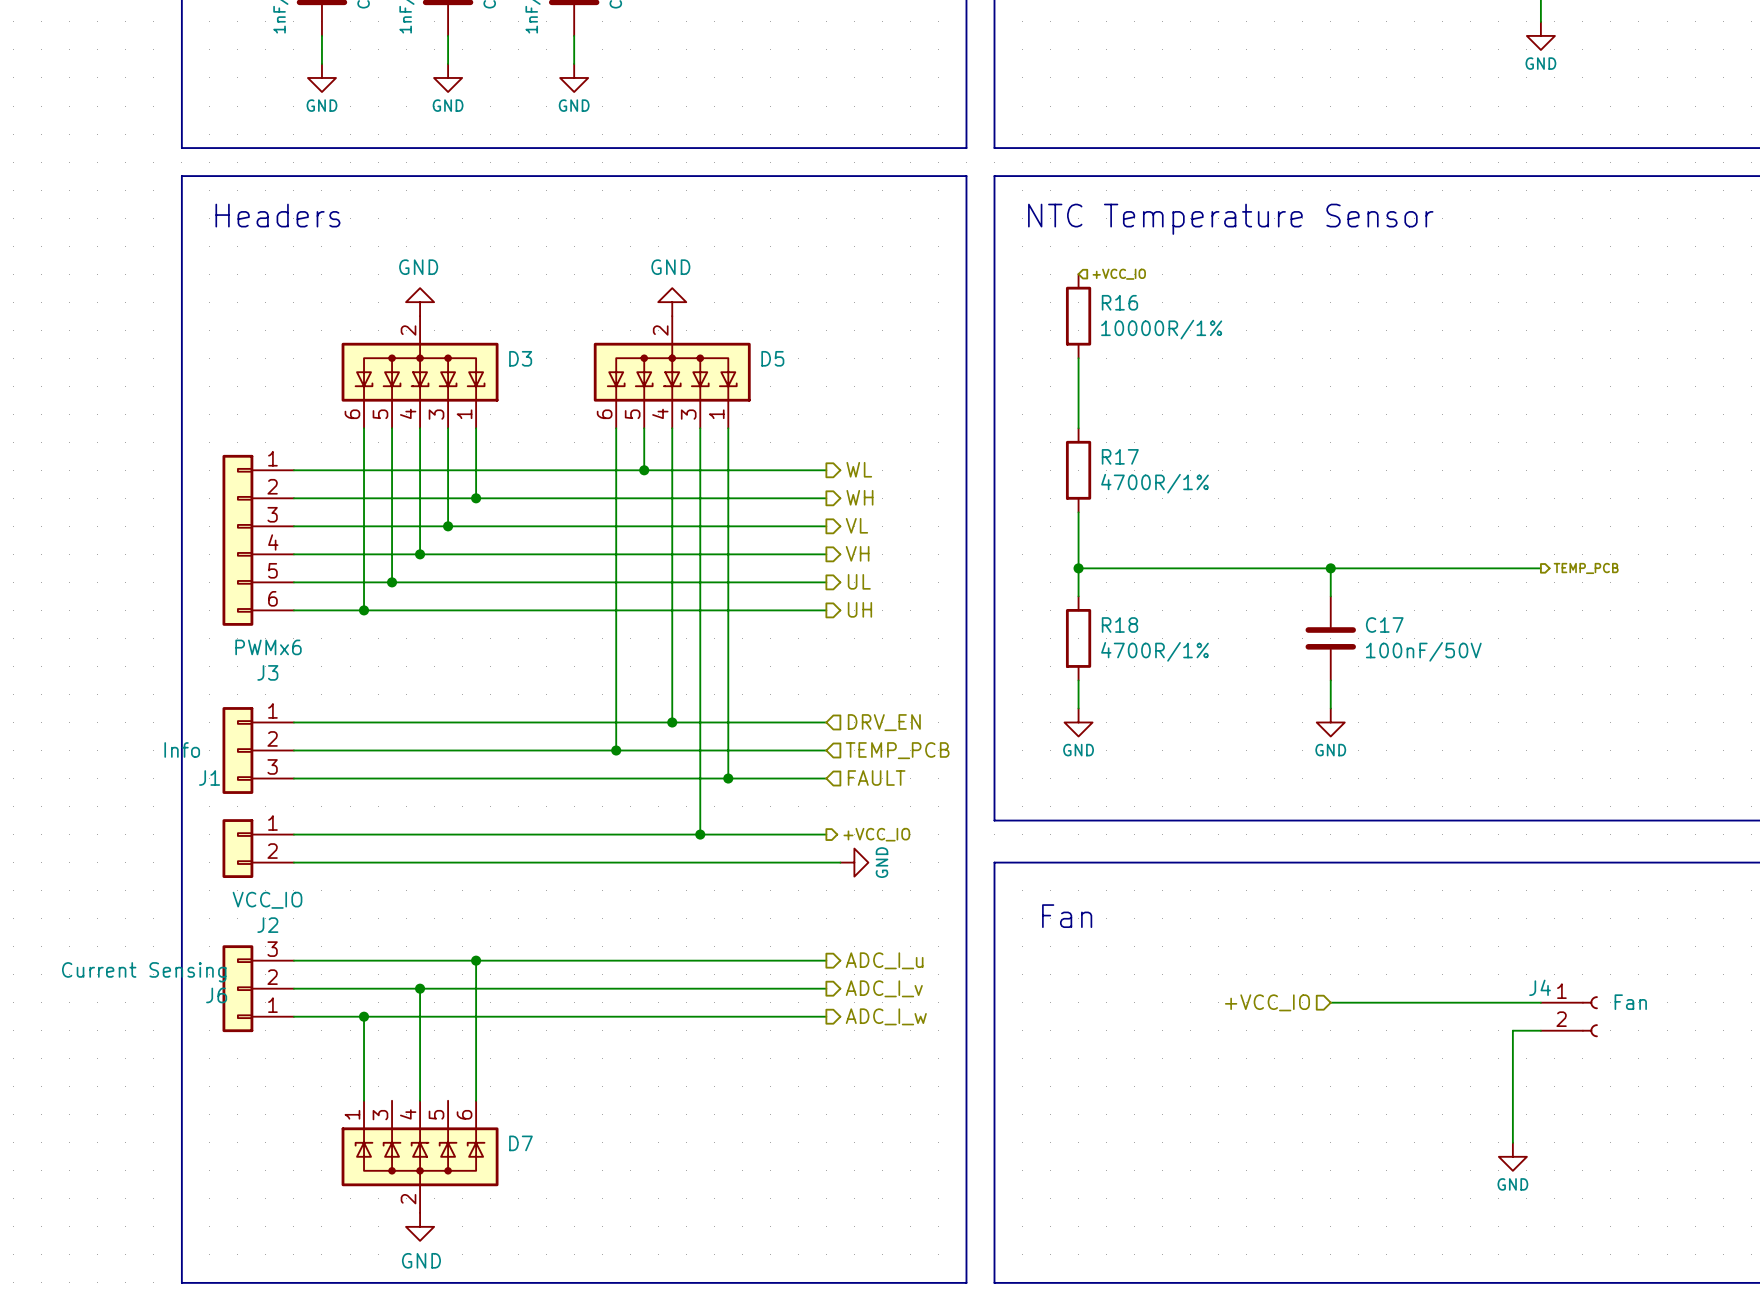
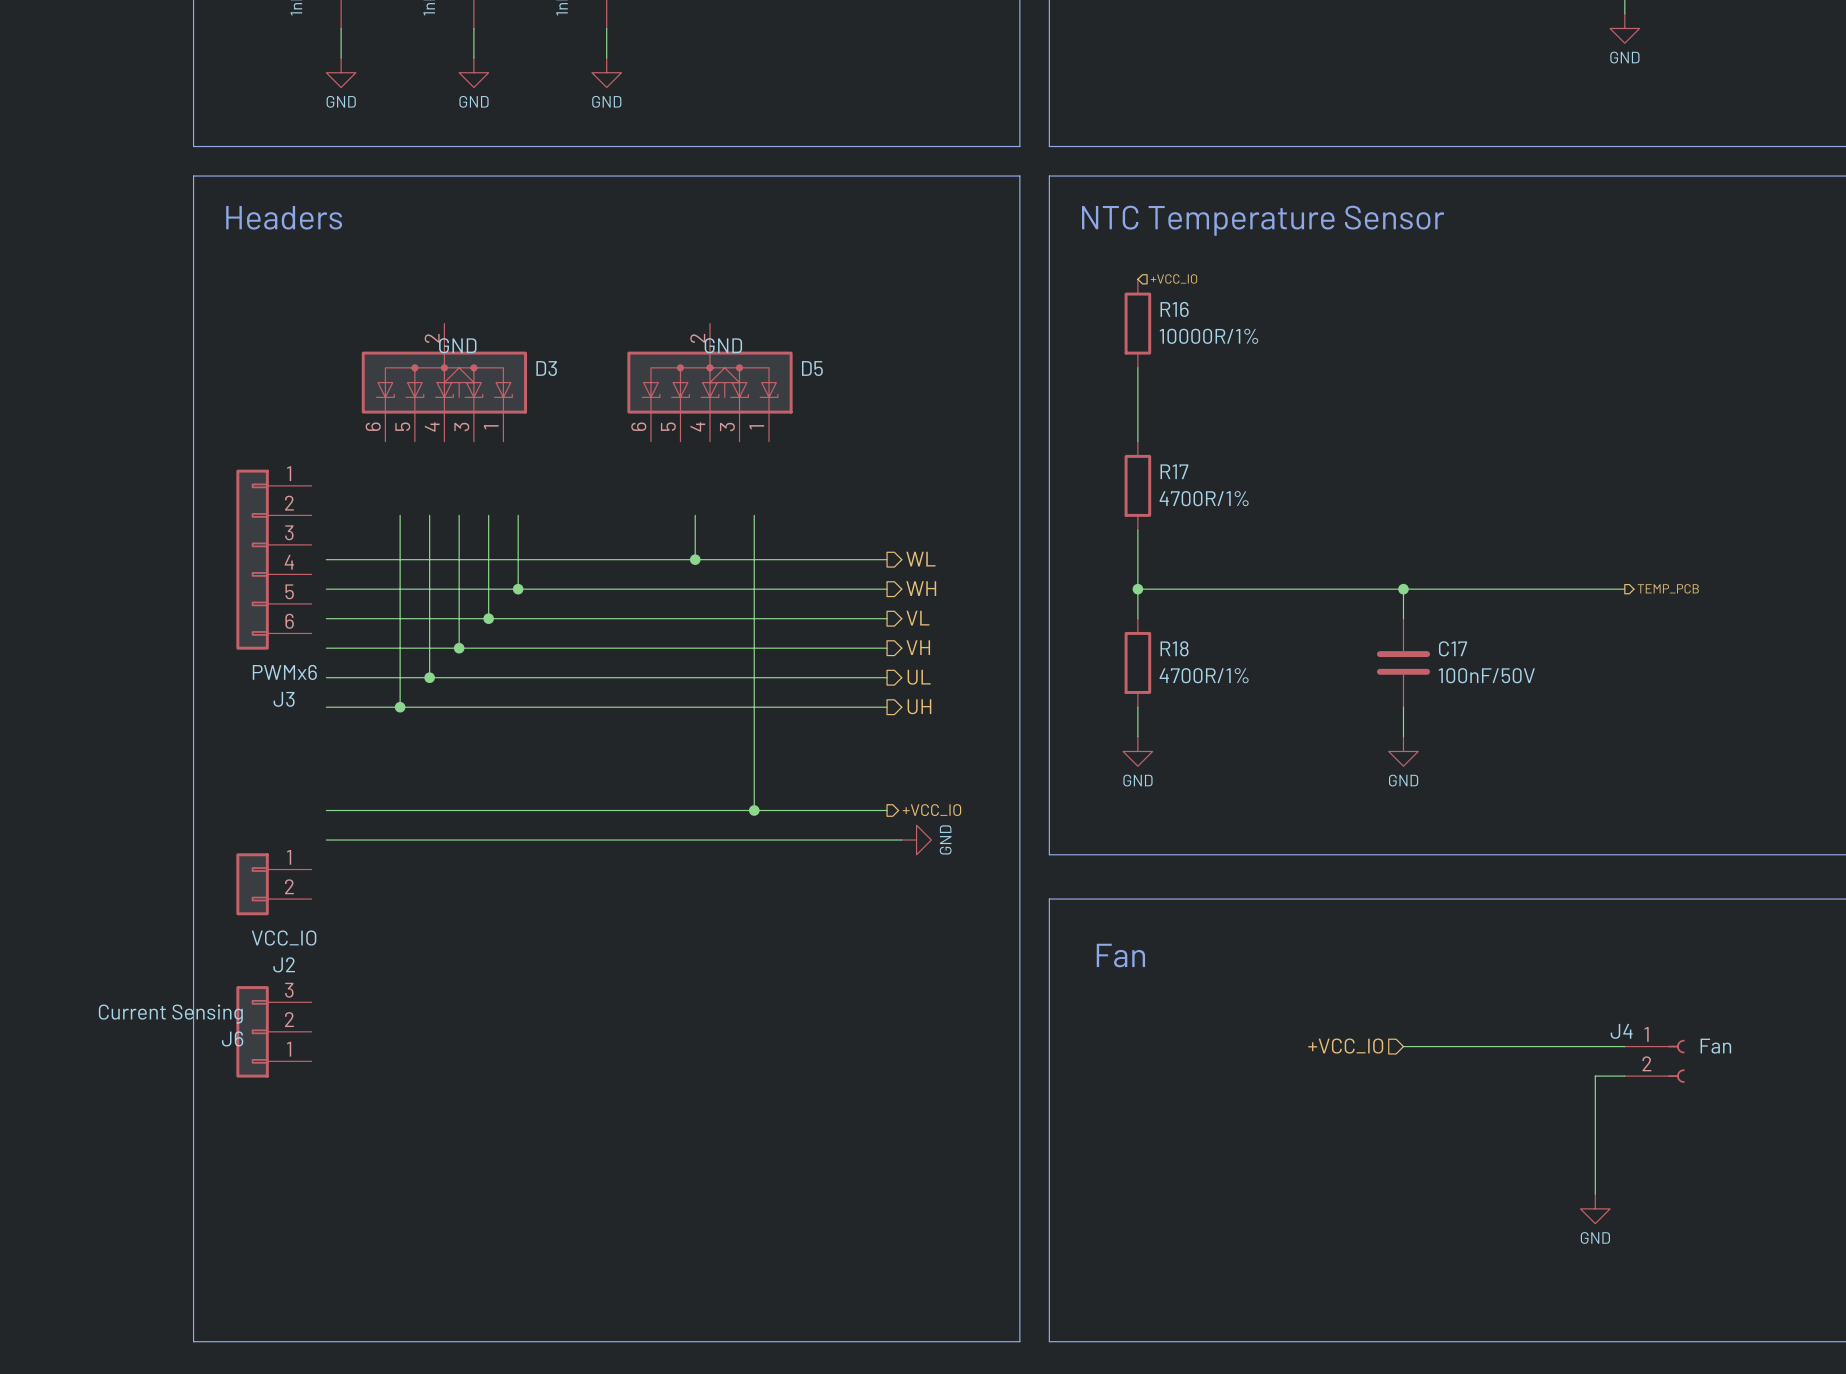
power symbol position: GND (420, 302) -> GND (459, 382)
power symbol position: GND (672, 302) -> GND (724, 382)
wire: (364, 428) (364, 610) -> (400, 515) (400, 707)
wire: (392, 428) (392, 582) -> (429, 515) (429, 677)
wire: (420, 428) (420, 554) -> (459, 515) (459, 648)
wire: (448, 428) (448, 526) -> (488, 515) (488, 618)
wire: (476, 428) (476, 498) -> (518, 515) (518, 589)
wire: (616, 428) (616, 750) -> none
wire: (644, 428) (644, 470) -> (695, 515) (695, 559)
wire: (672, 428) (672, 722) -> none
wire: (700, 428) (700, 834) -> none
wire: (728, 428) (728, 778) -> none
hierarchical label position: WL (859, 469) -> WL (920, 559)
wire: (293, 470) (826, 470) -> (326, 559) (887, 559)
junction: (644, 470) -> none
hierarchical label position: WH (859, 497) -> WH (921, 588)
wire: (293, 498) (826, 498) -> (326, 589) (887, 589)
junction: (476, 498) -> none
wire: none -> (754, 515) (754, 810)
hierarchical label position: VL (856, 525) -> VL (917, 618)
wire: (293, 526) (826, 526) -> (326, 618) (887, 618)
junction: (448, 526) -> none
junction: none -> (695, 559)
hierarchical label position: VH (857, 553) -> VH (918, 647)
wire: (293, 554) (826, 554) -> (326, 648) (887, 648)
junction: (420, 554) -> none
junction: none -> (518, 589)
hierarchical label position: UL (859, 581) -> UL (919, 677)
wire: (293, 582) (826, 582) -> (326, 677) (887, 677)
junction: (392, 582) -> none
junction: none -> (488, 618)
hierarchical label position: UH (859, 609) -> UH (919, 706)
wire: (293, 610) (826, 610) -> (326, 707) (887, 707)
junction: (364, 610) -> none
junction: none -> (459, 648)
junction: none -> (429, 677)
junction: none -> (400, 707)
wire: (293, 722) (826, 722) -> none
junction: (672, 722) -> none
hierarchical label: DRV_EN (884, 722) -> none
J1: Info (258, 750) -> none
wire: (293, 750) (826, 750) -> none
junction: (616, 750) -> none
hierarchical label: TEMP_PCB (897, 750) -> none
wire: (293, 778) (307, 778) -> none
junction position: (728, 778) -> (754, 810)
wire: none -> (872, 810) (887, 810)
hierarchical label: FAULT (876, 778) -> none
wire: (293, 834) (826, 834) -> none
junction: (700, 834) -> none
hierarchical label position: +VCC_IO (876, 834) -> +VCC_IO (931, 810)
wire: (293, 862) (840, 862) -> (326, 840) (901, 840)
power symbol position: GND (854, 862) -> GND (916, 840)
wire: (293, 960) (826, 960) -> none
wire: (476, 960) (476, 1100) -> none
junction: (476, 960) -> none
hierarchical label: ADC_I_u (884, 960) -> none
wire: (293, 988) (826, 988) -> none
wire: (420, 988) (420, 1100) -> none
junction: (420, 988) -> none
hierarchical label: ADC_I_v (884, 988) -> none
wire: (293, 1016) (826, 1016) -> none
wire: (364, 1016) (364, 1100) -> none
junction: (364, 1016) -> none
hierarchical label: ADC_I_w (886, 1016) -> none
D7: (420, 1156) -> none
power symbol: GND (420, 1226) -> none

